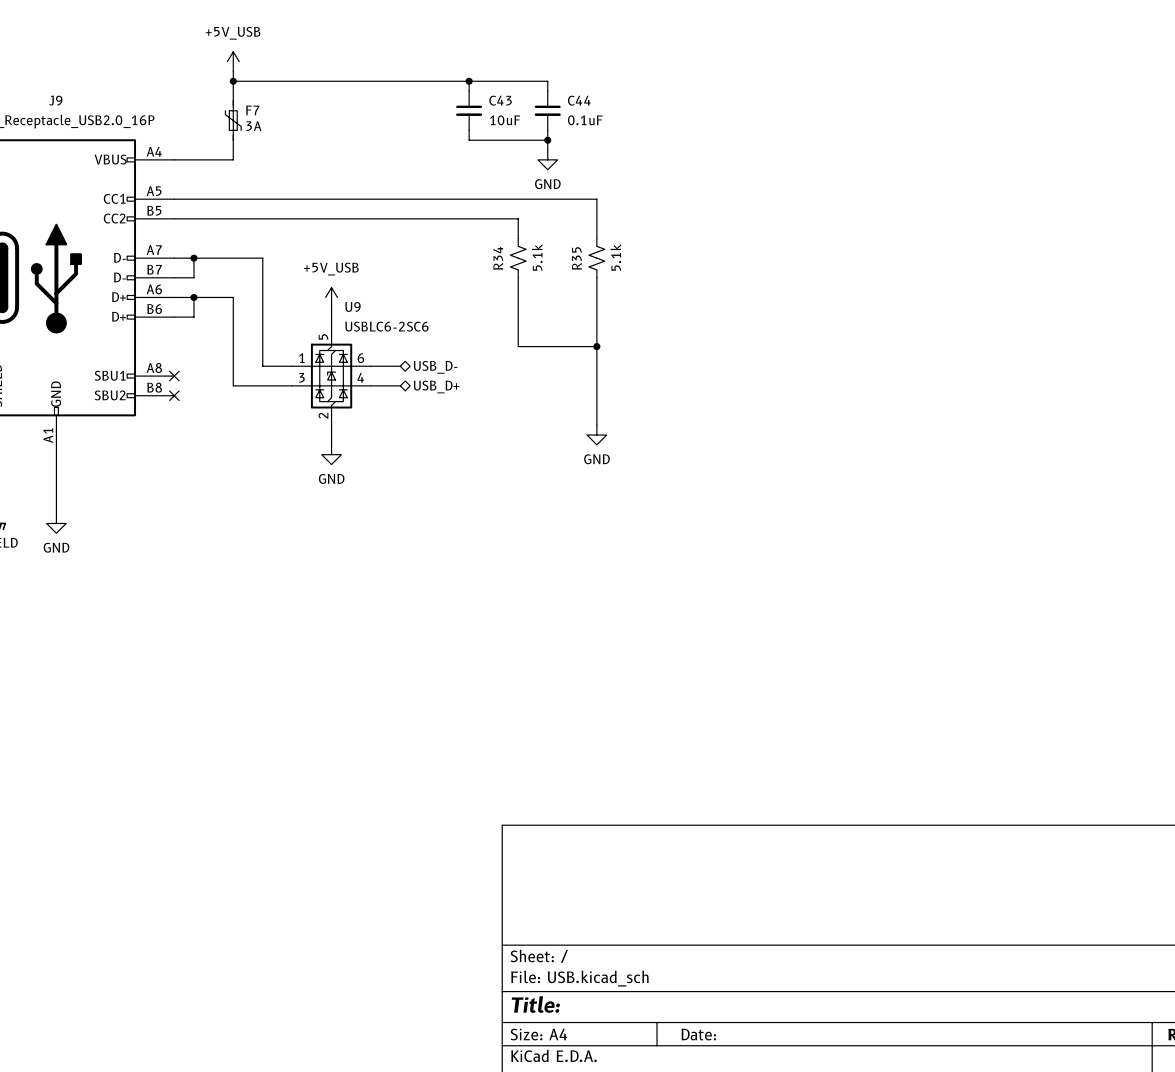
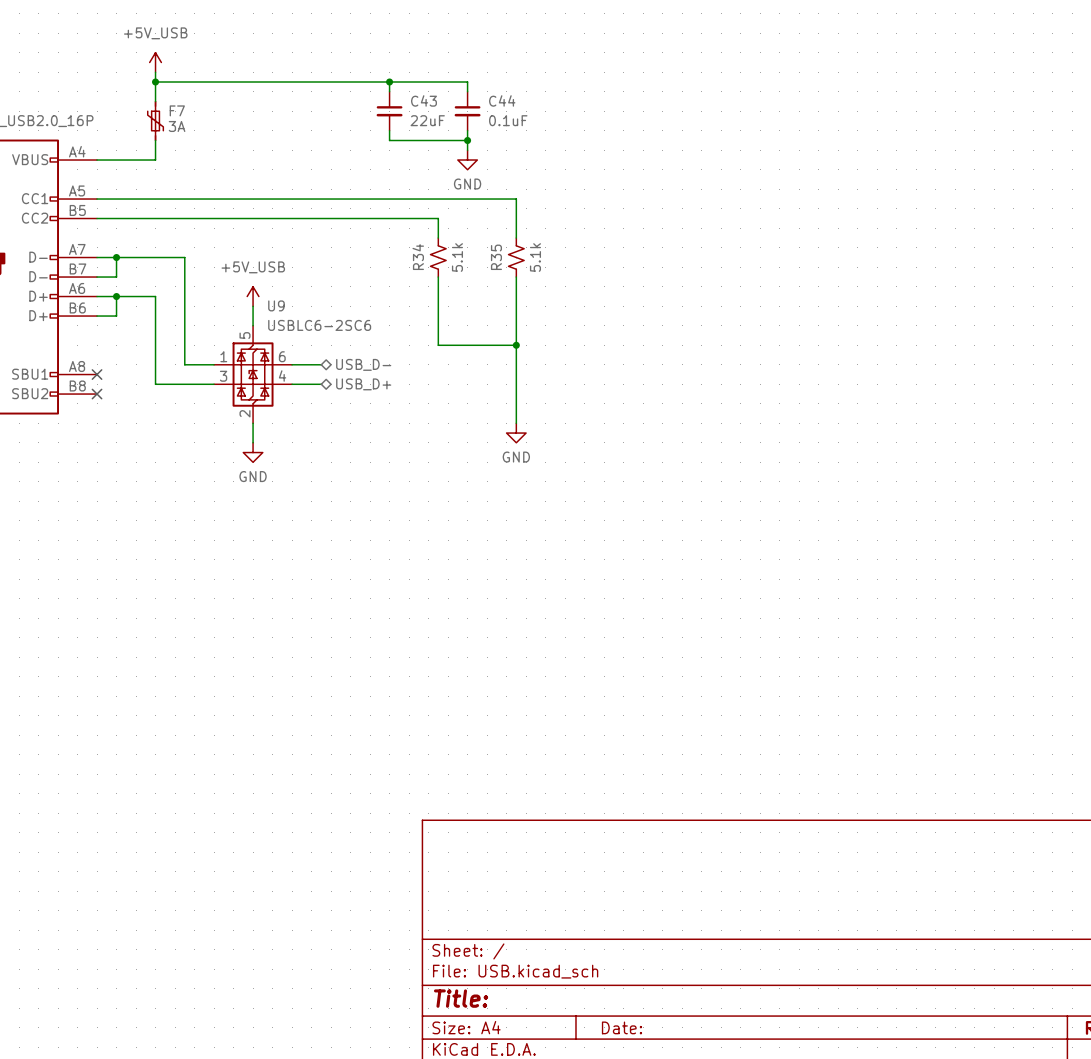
C43 value: 10uF (505, 120) -> 22uF (427, 120)

